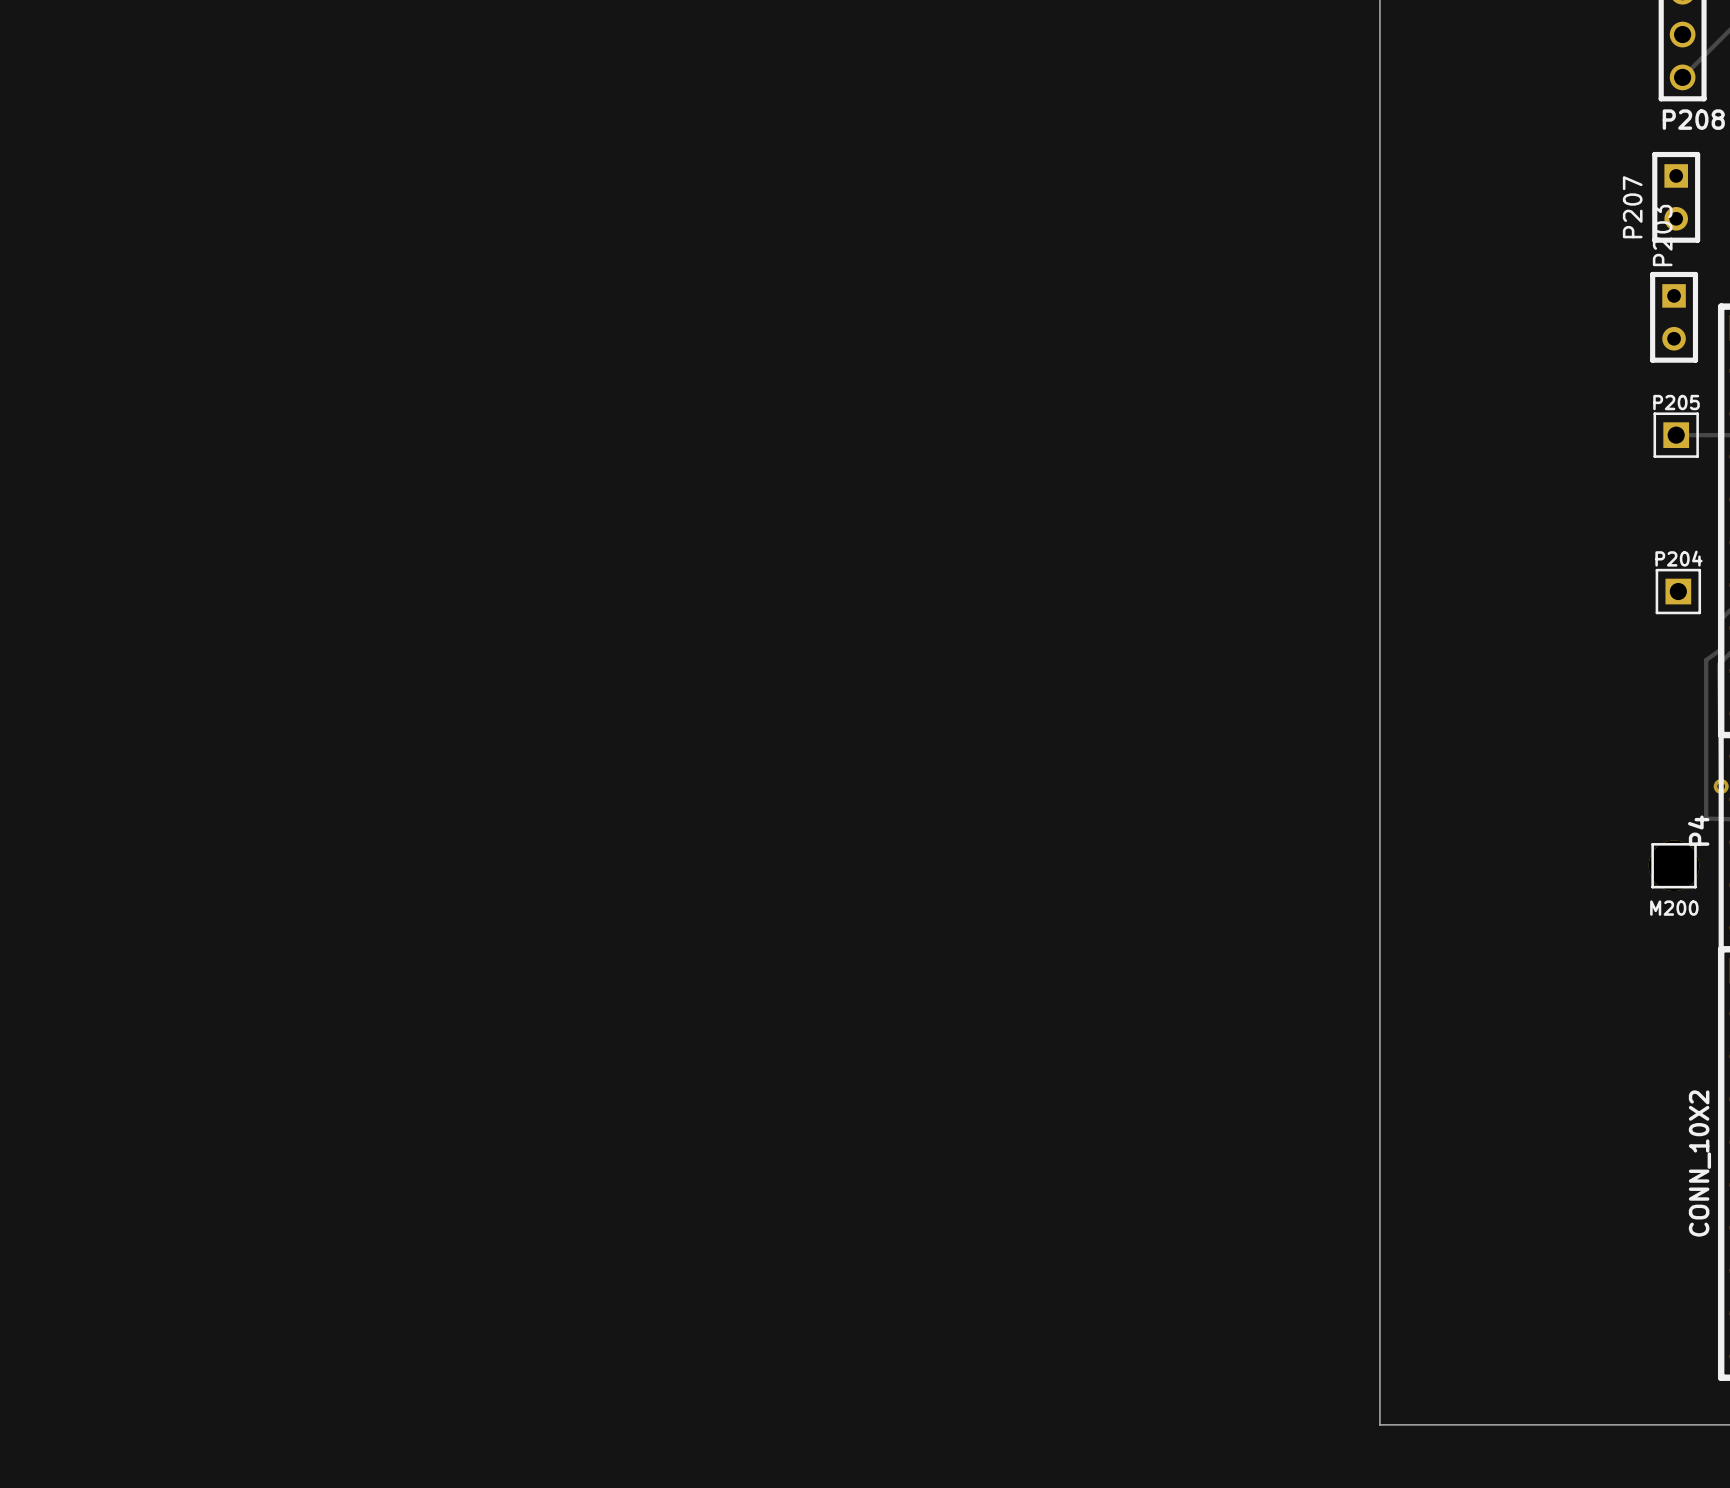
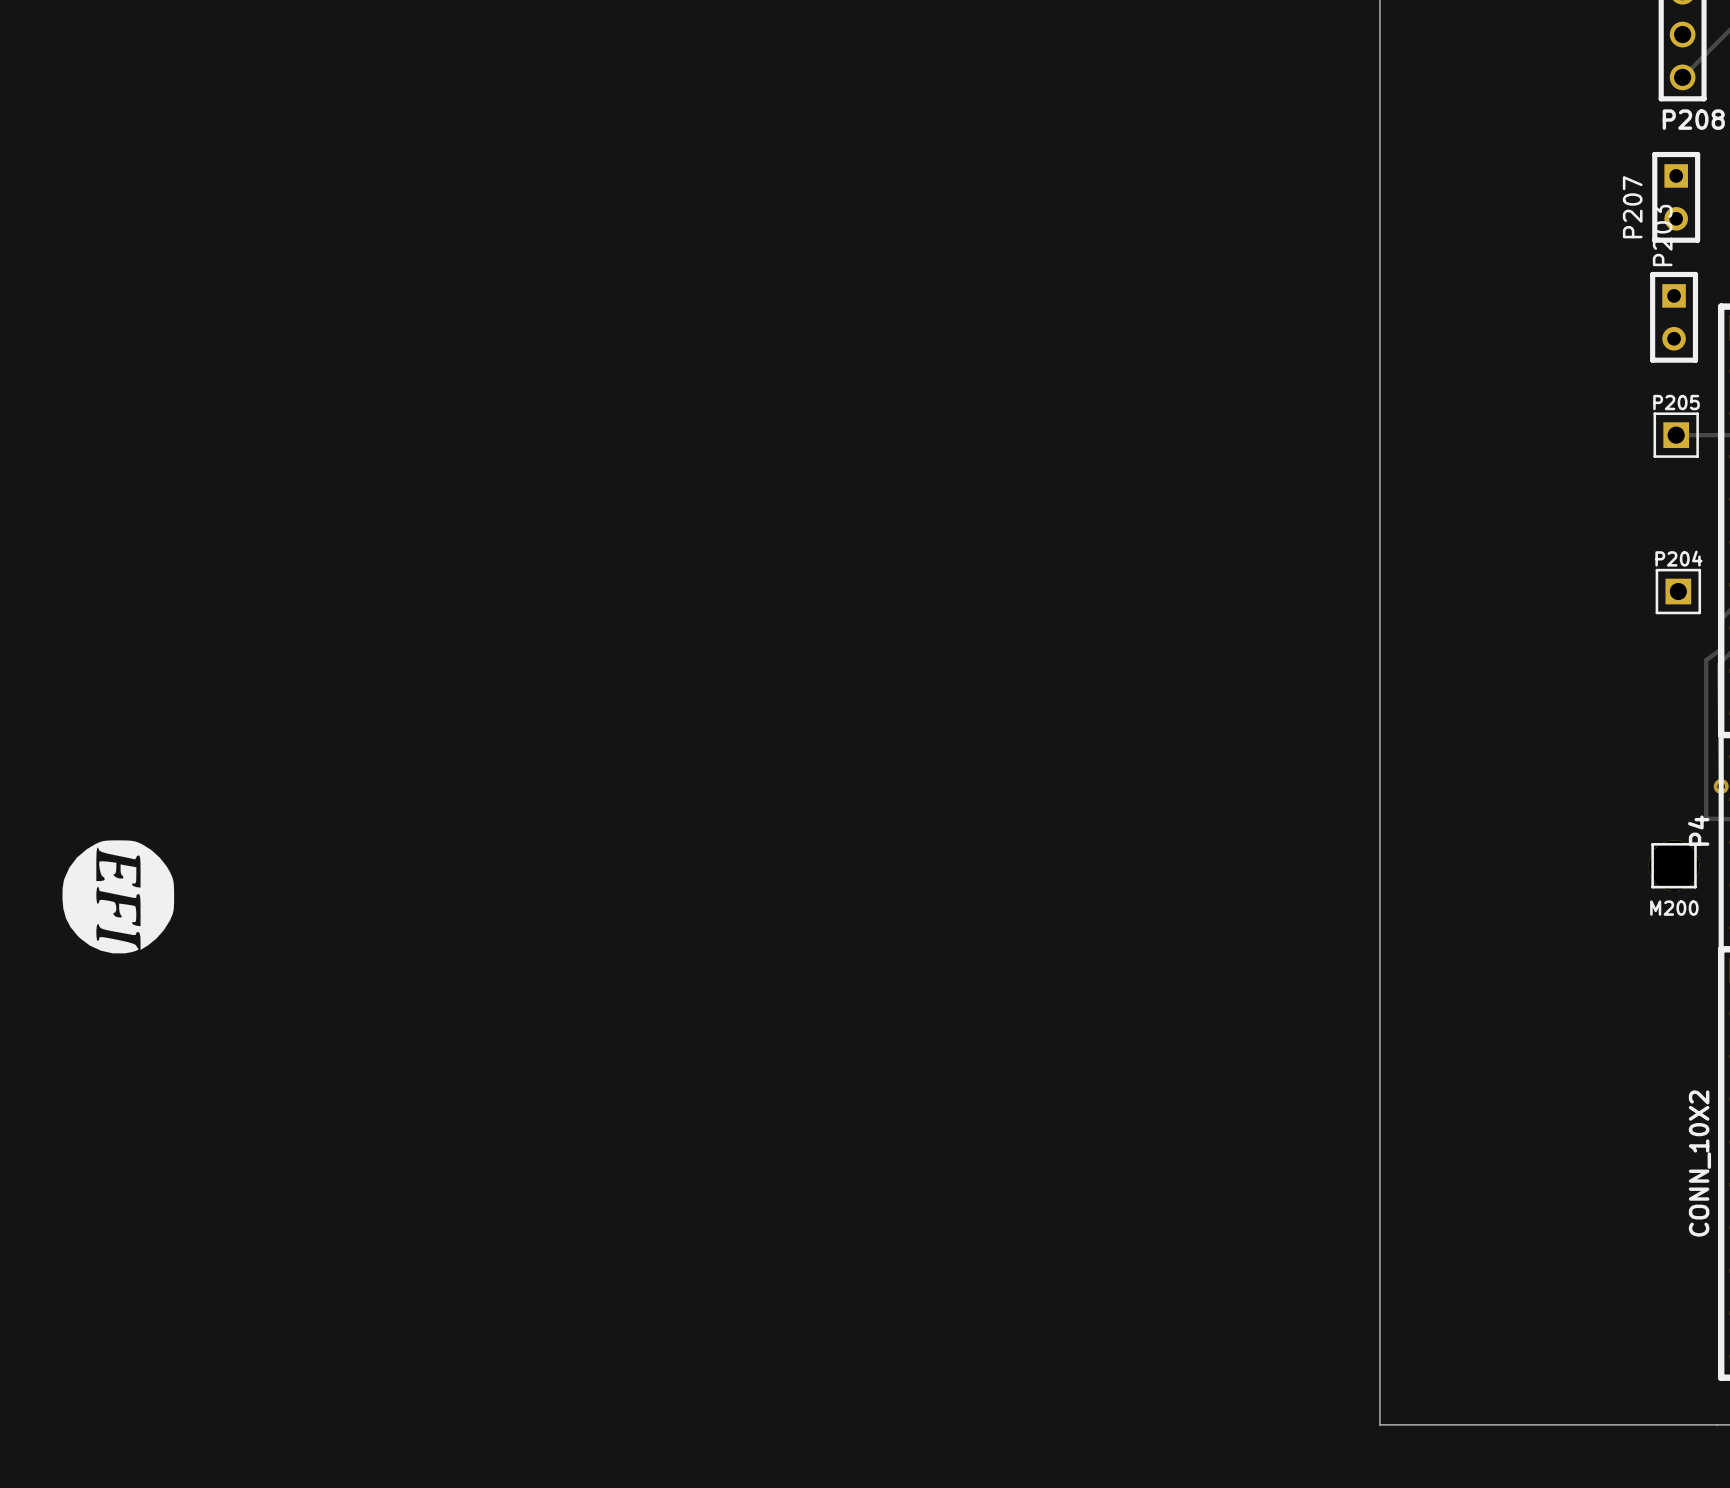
drawing: none -> [62, 840, 175, 954]

